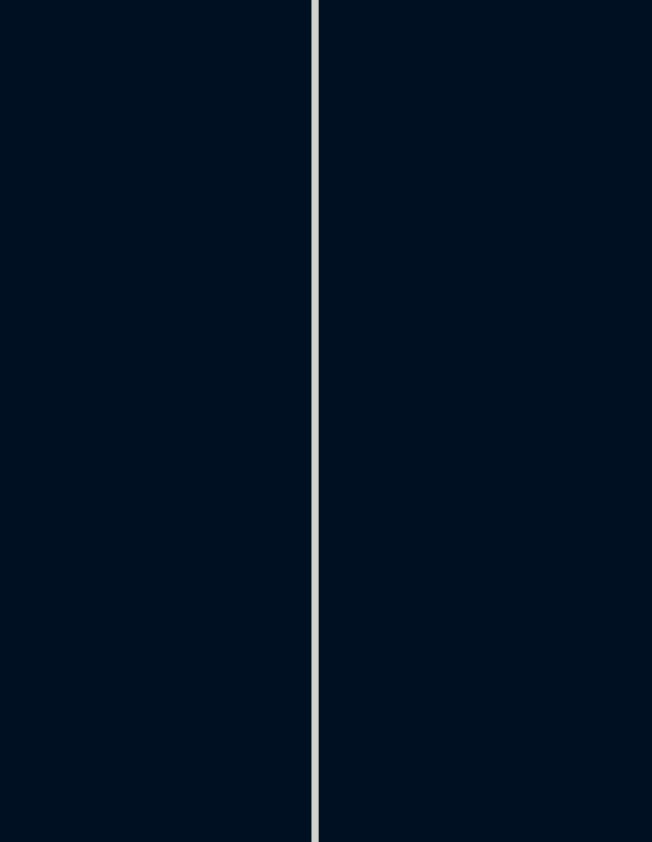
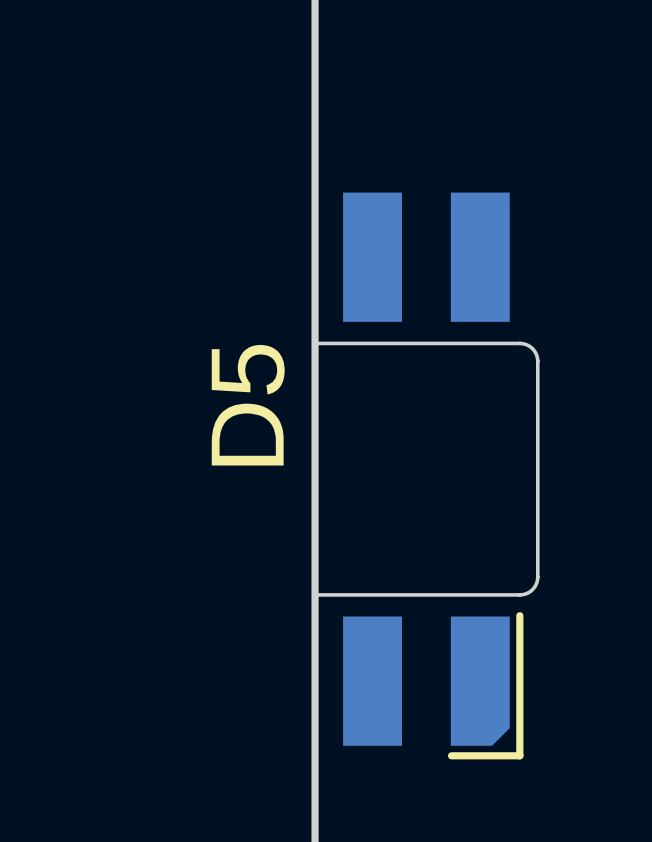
D5: none -> (426, 475)

